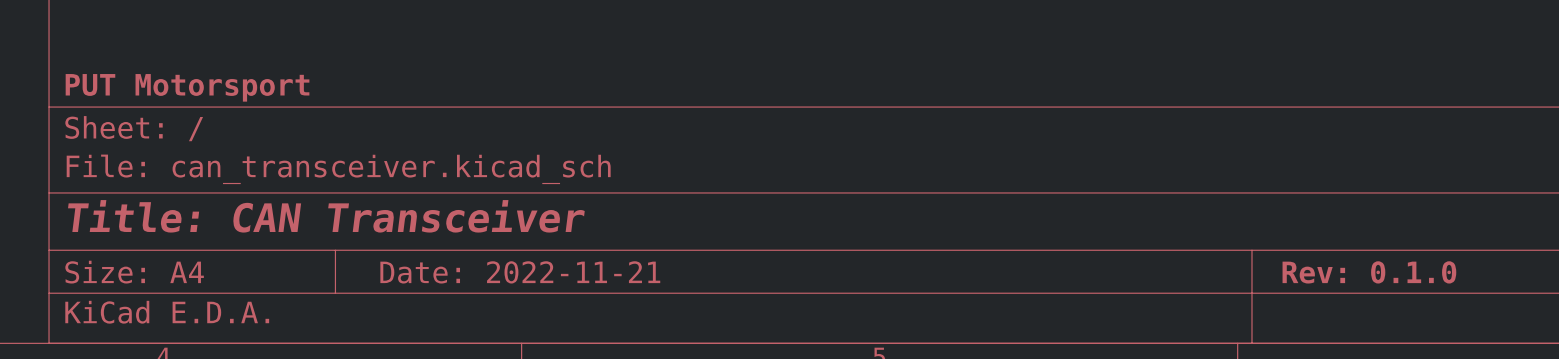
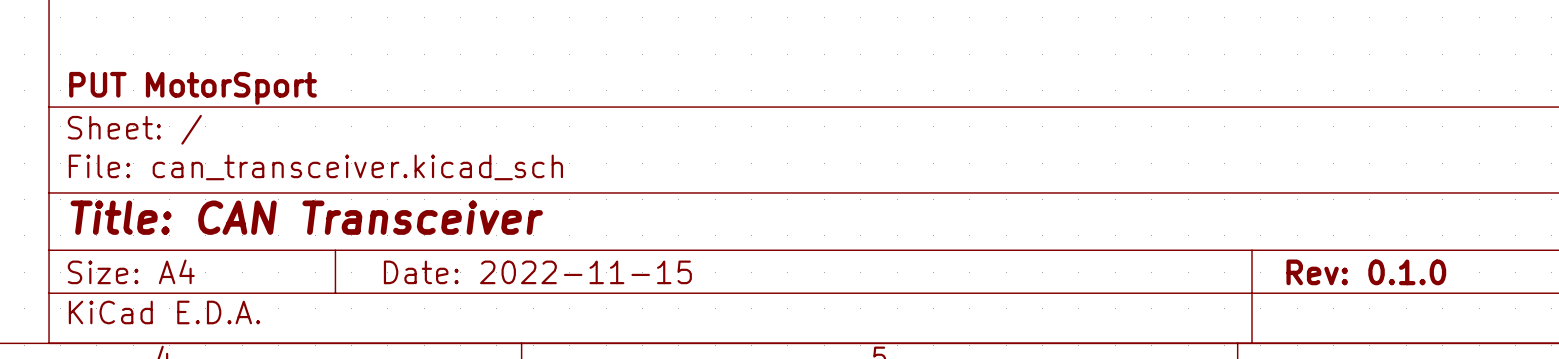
title block: PUT Motorsport (187, 87) -> PUT MotorSport (193, 88)
title block: Date: 2022-11-21 (520, 272) -> Date: 2022-11-15 (537, 272)

